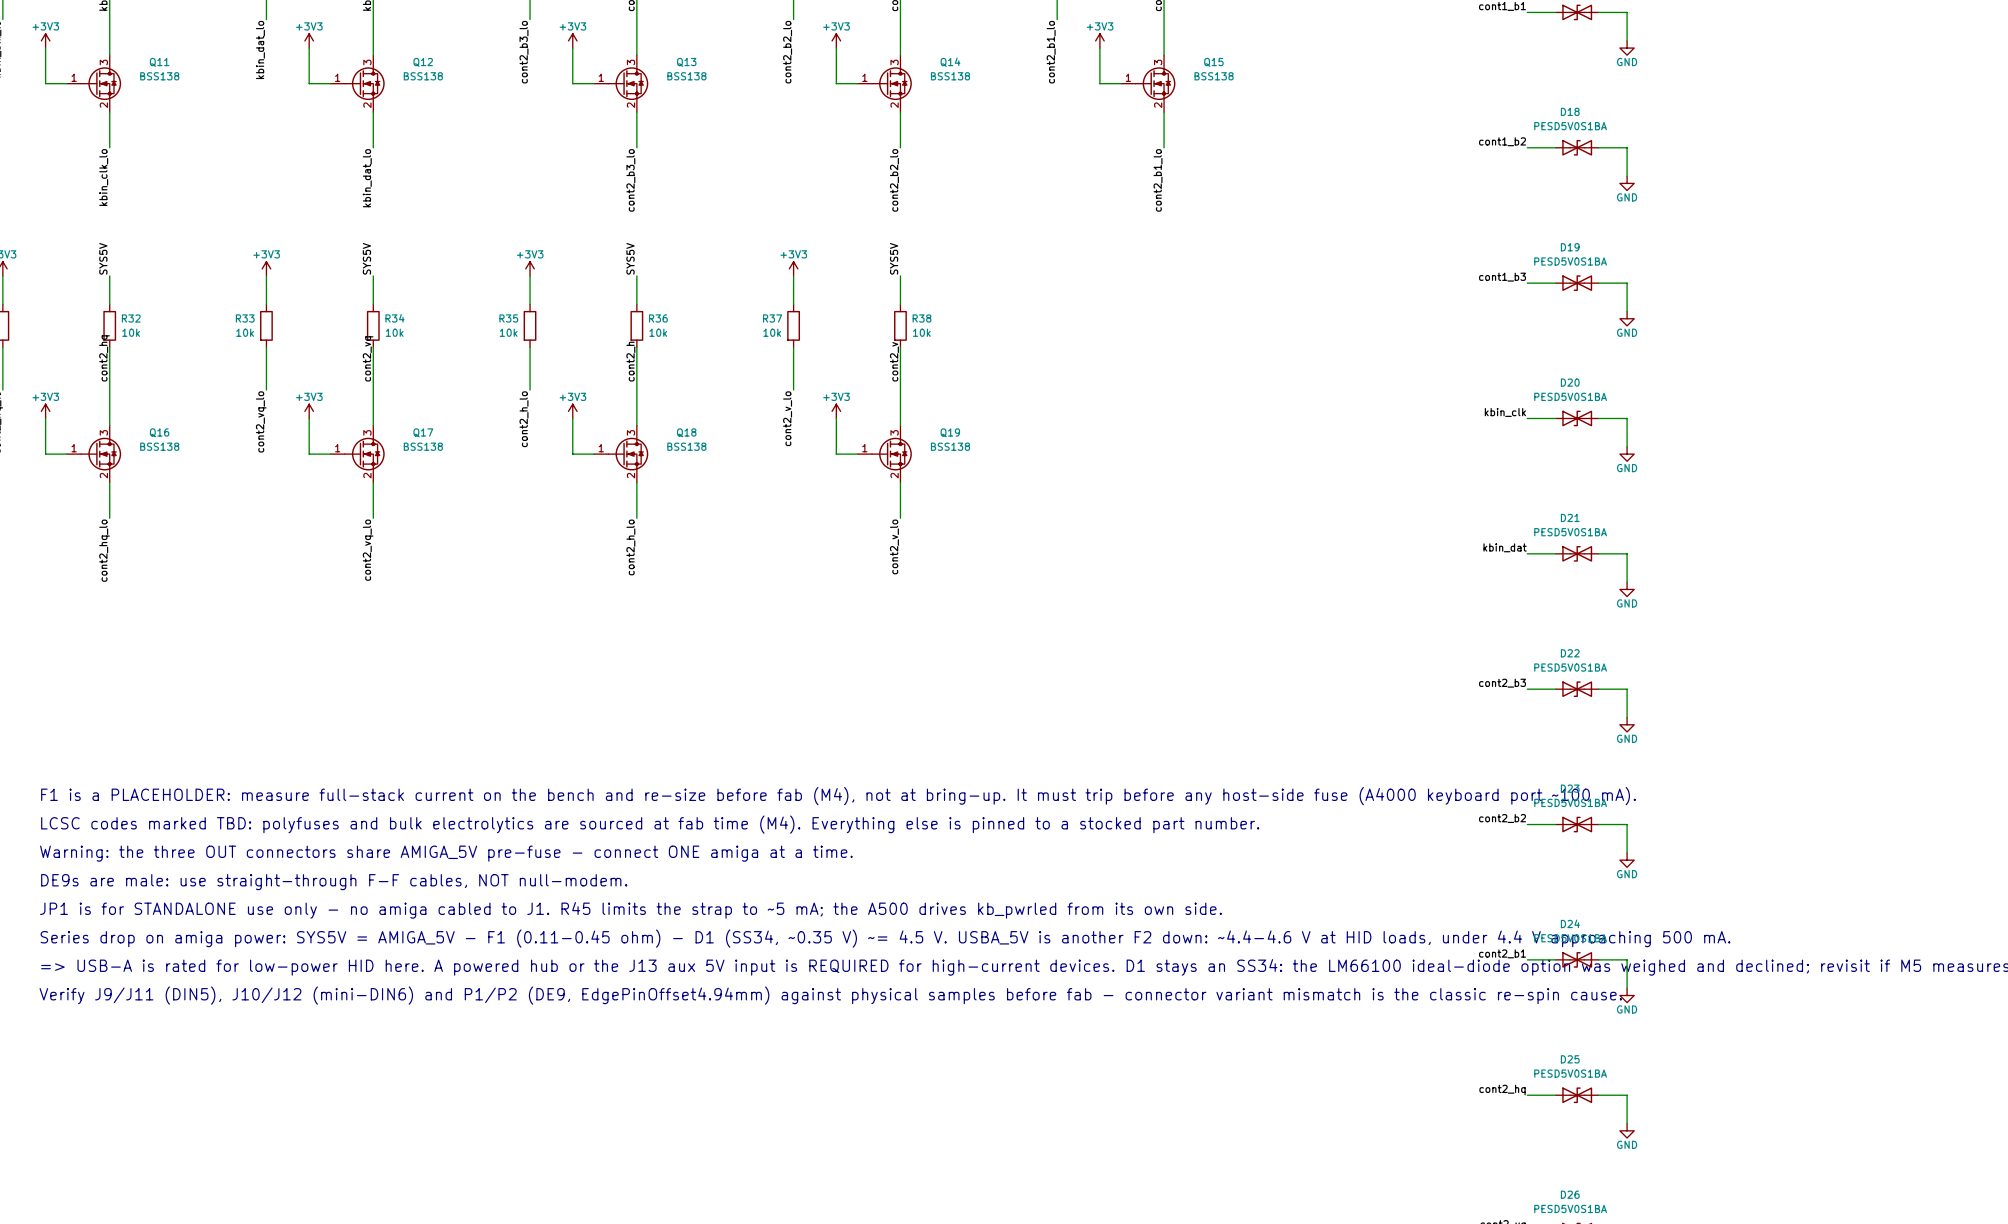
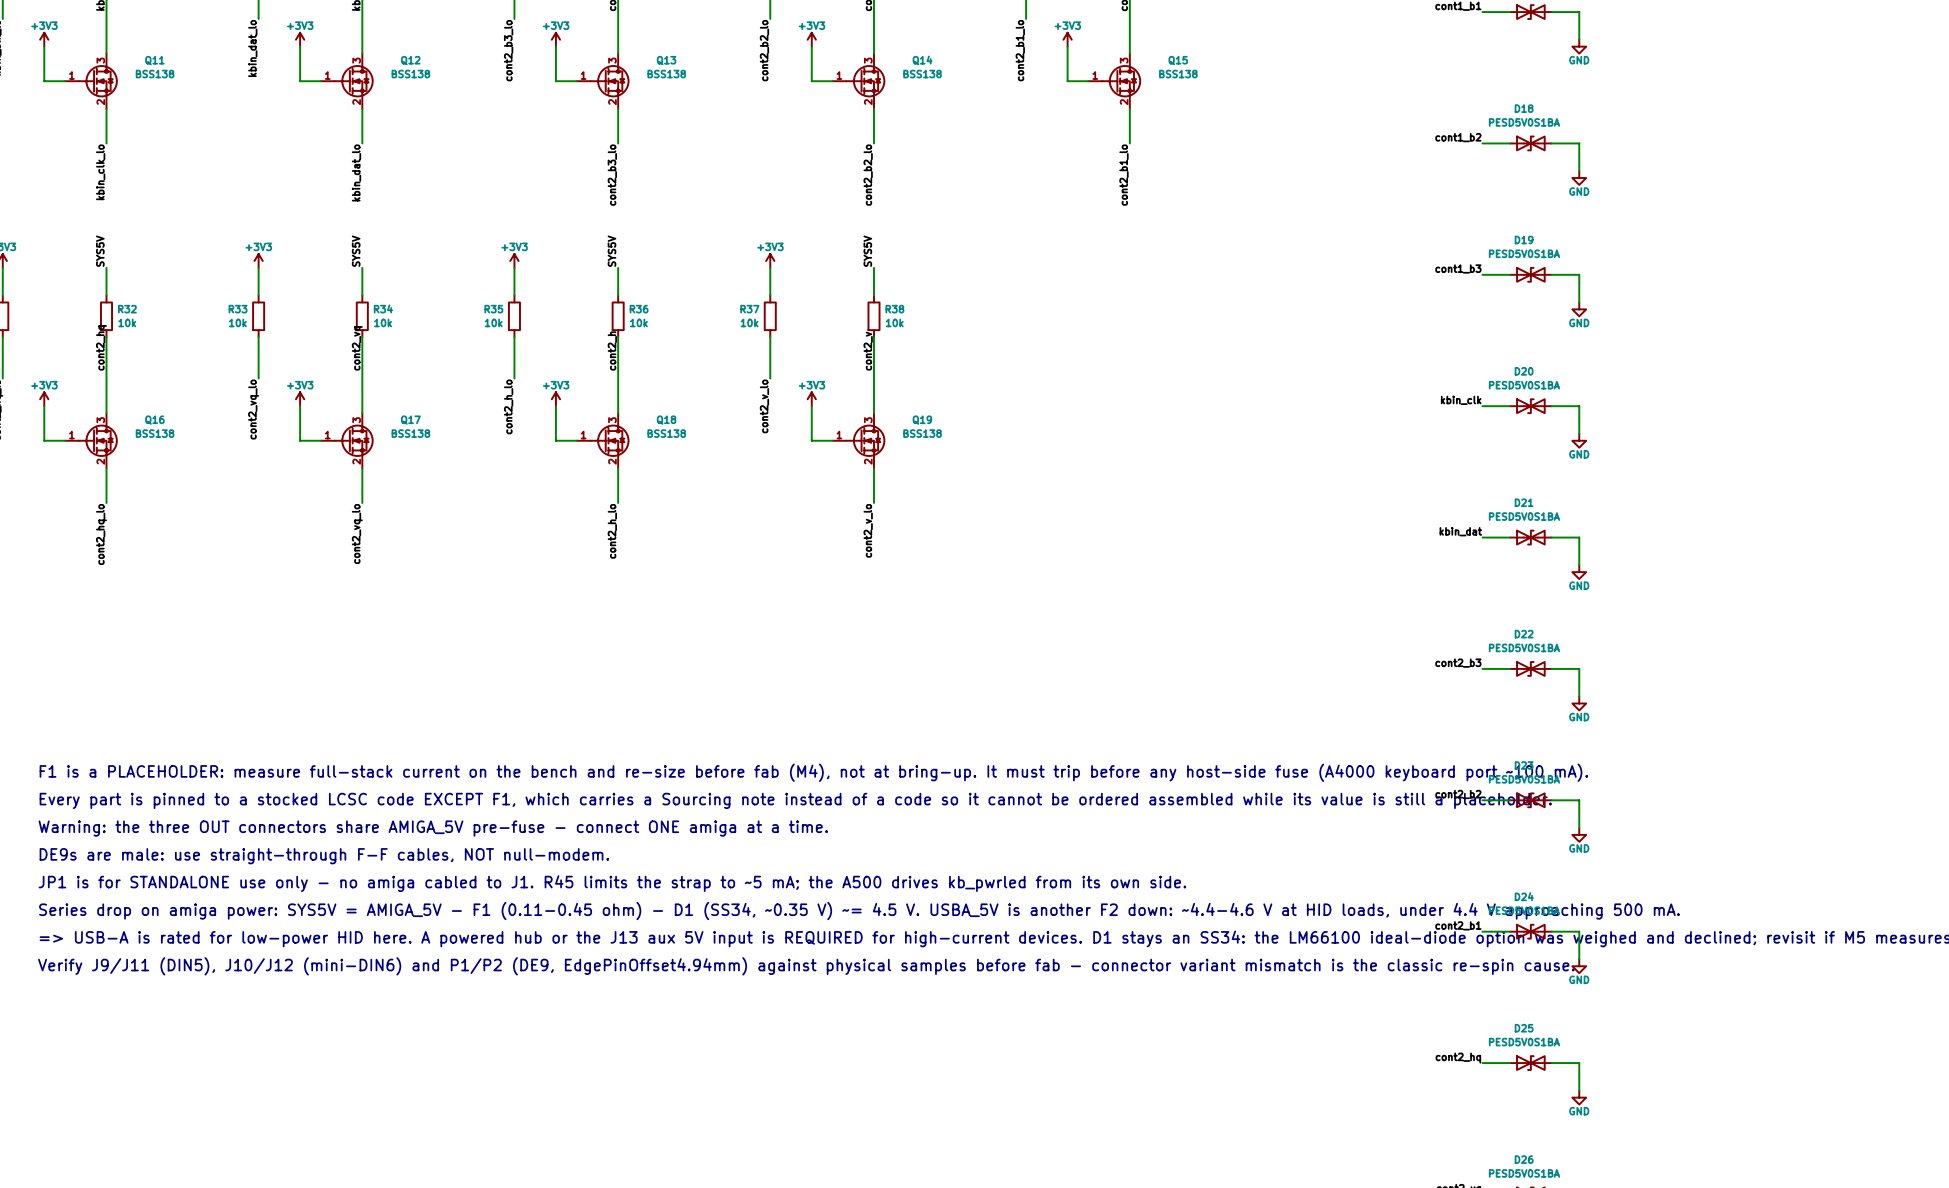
text: LCSC codes marked TBD: polyfuses and bulk electrolytics are sourced at fab time (M4). Everything else is pinned to a stocked part number. (650, 824) -> Every part is pinned to a stocked LCSC code EXCEPT F1, which carries a Sourcing note instead of a code so it cannot be ordered assembled while its value is still a placeholder. (795, 800)

